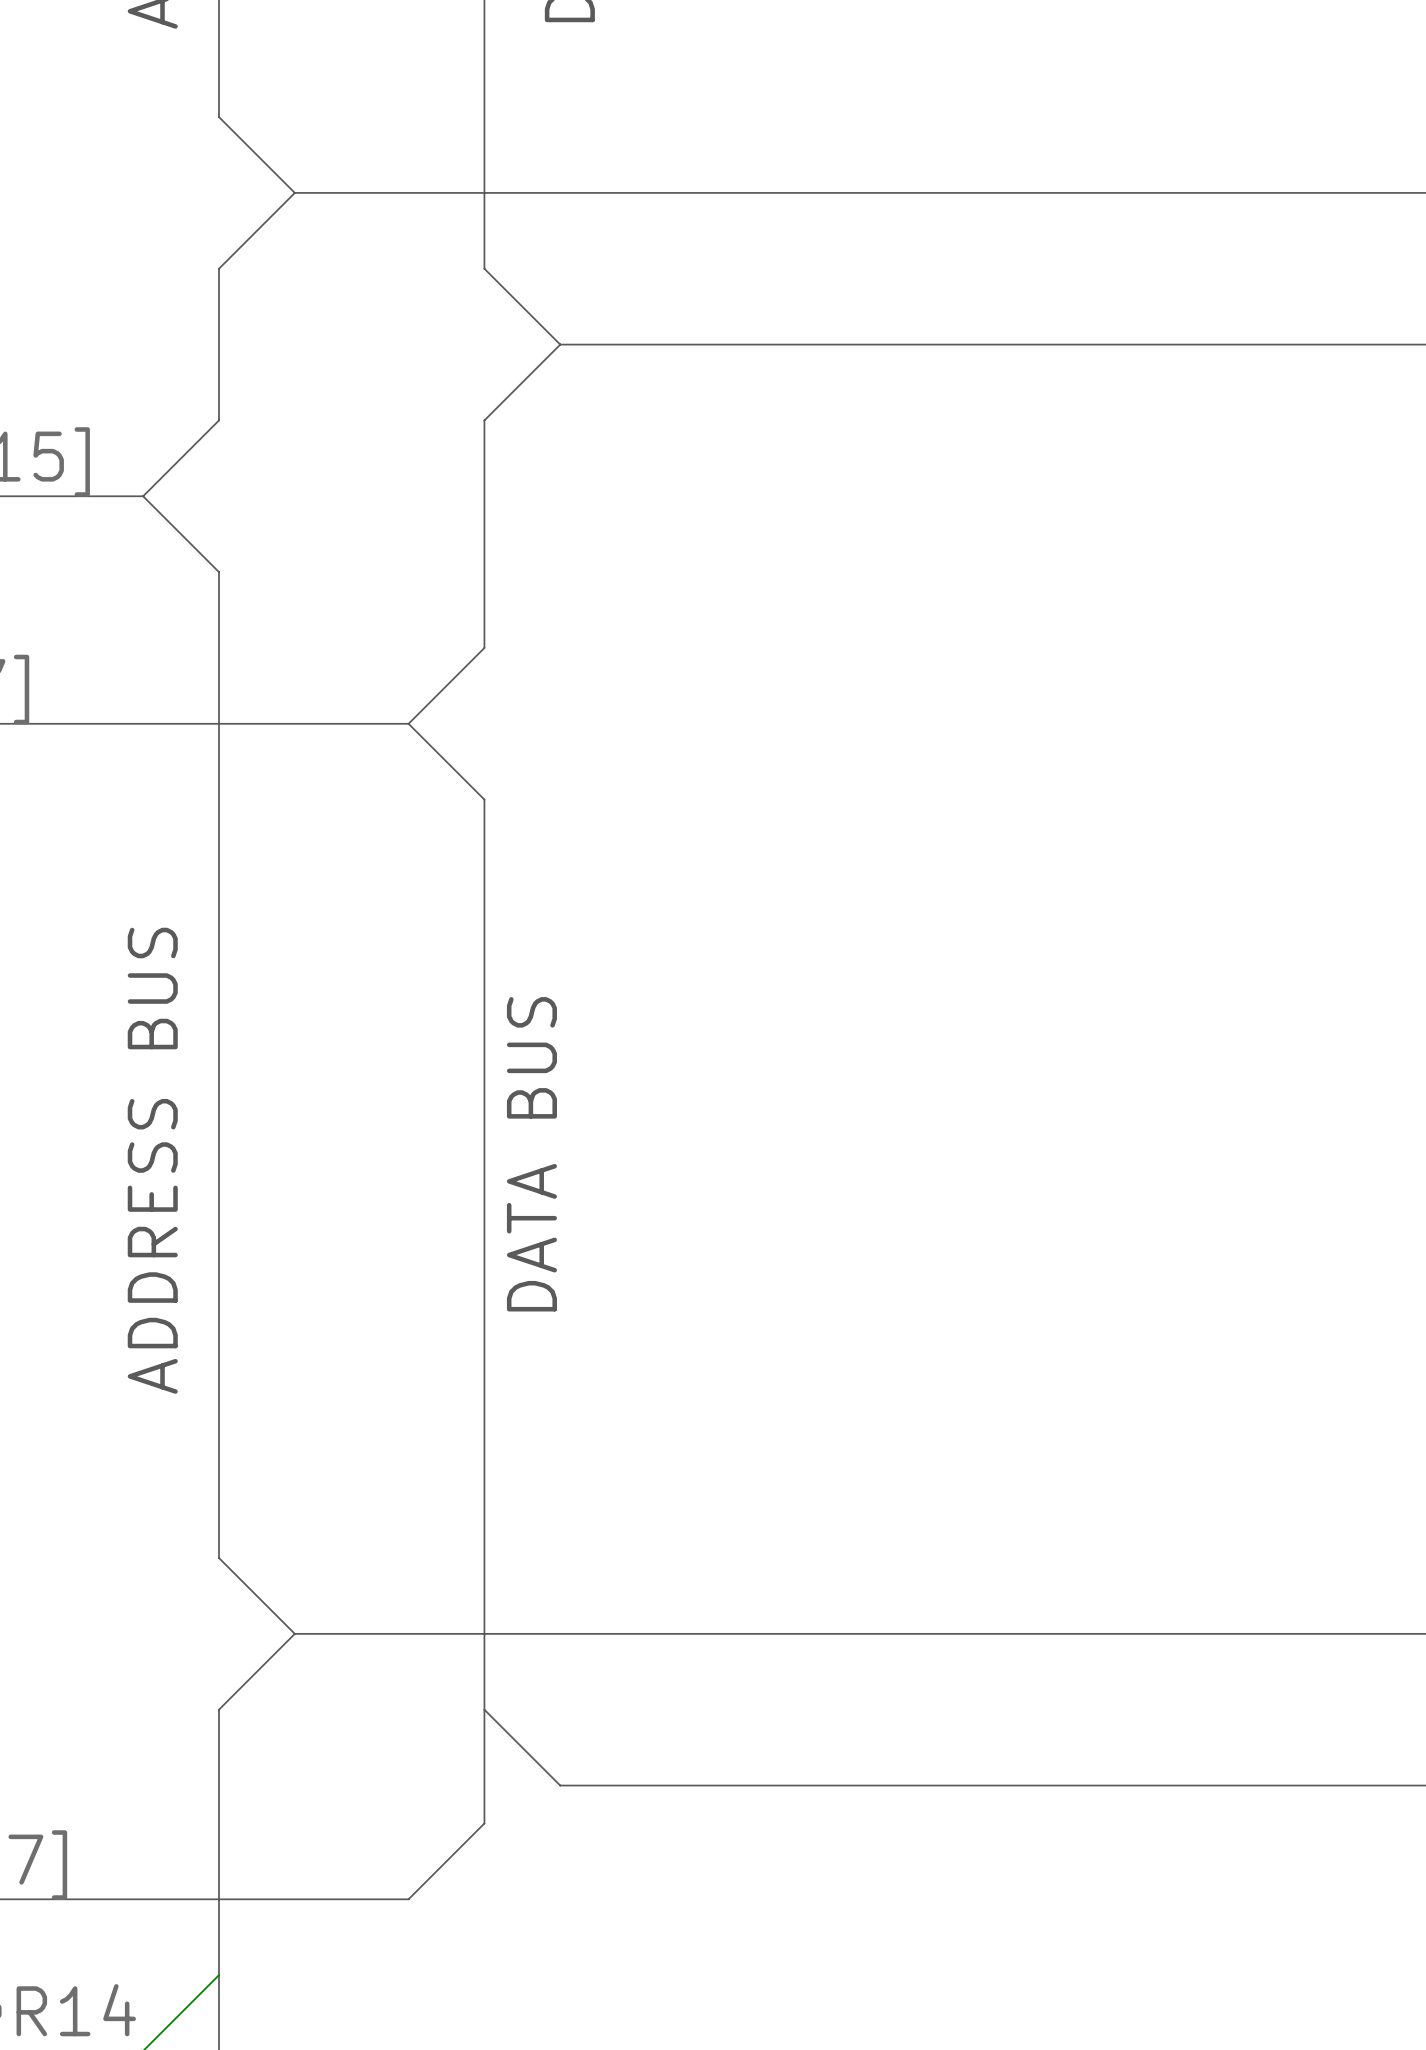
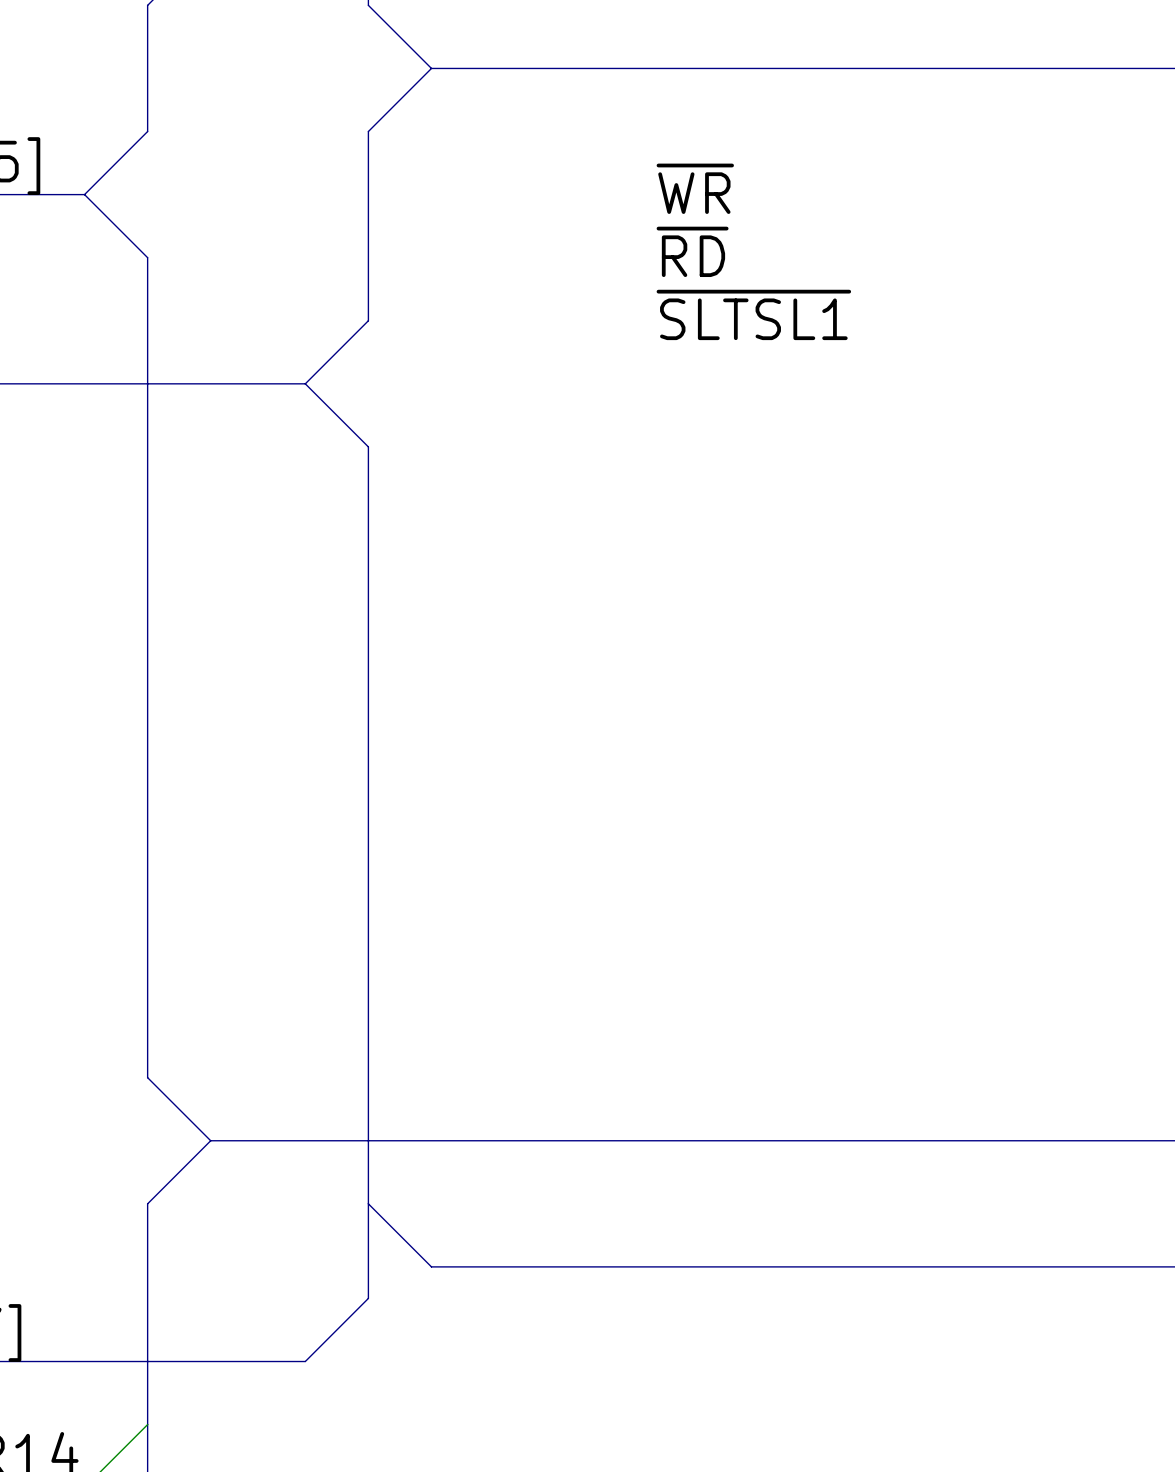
label: none -> ~{WR} (695, 188)
label: none -> ~{RD} (692, 251)
label: none -> ~{SLTSL1} (753, 314)
text: DATA BUS (531, 1154) -> none
text: ADDRESS BUS (152, 1160) -> none

